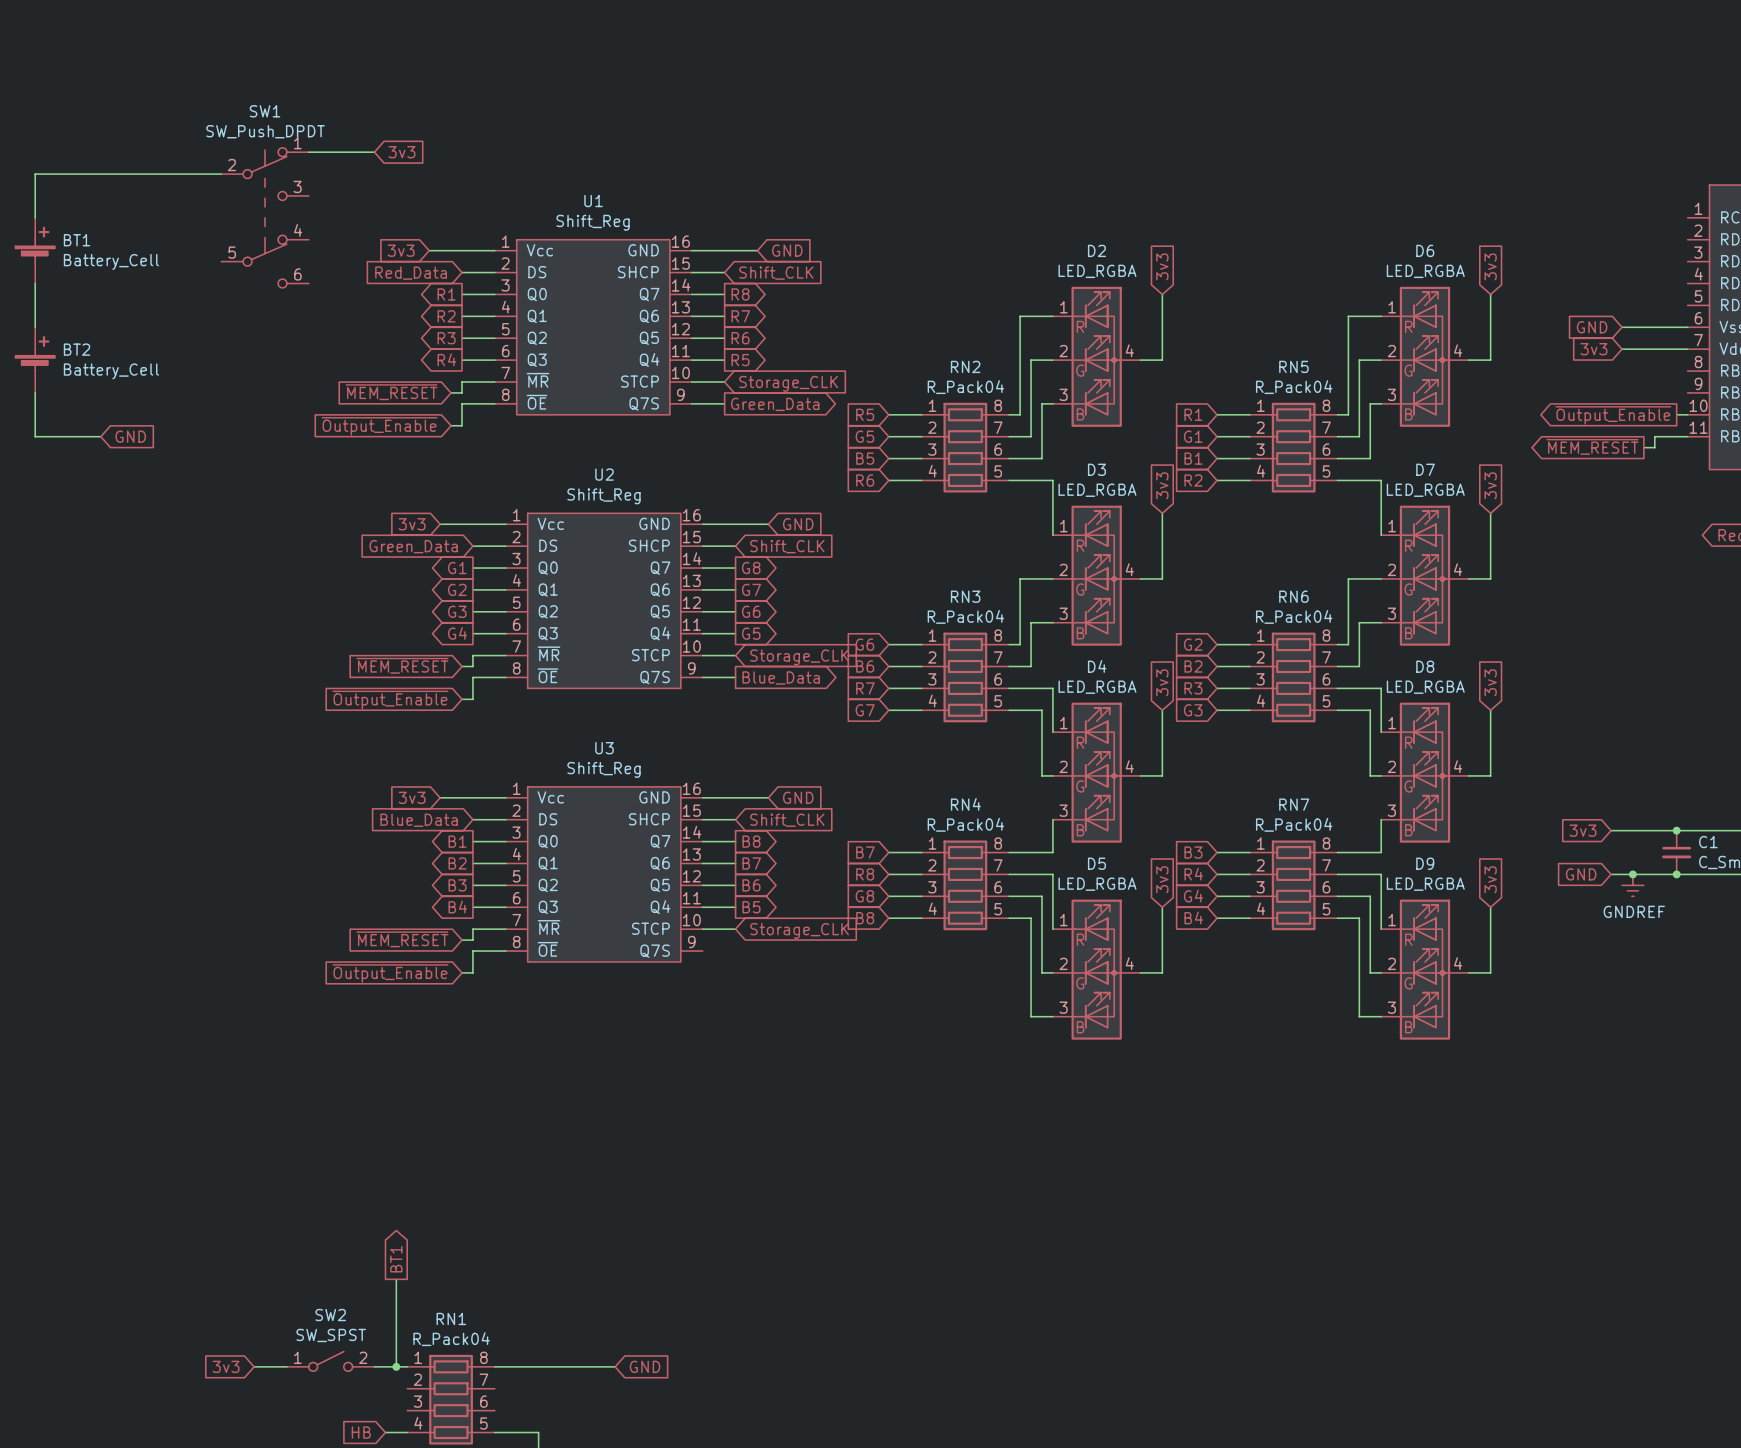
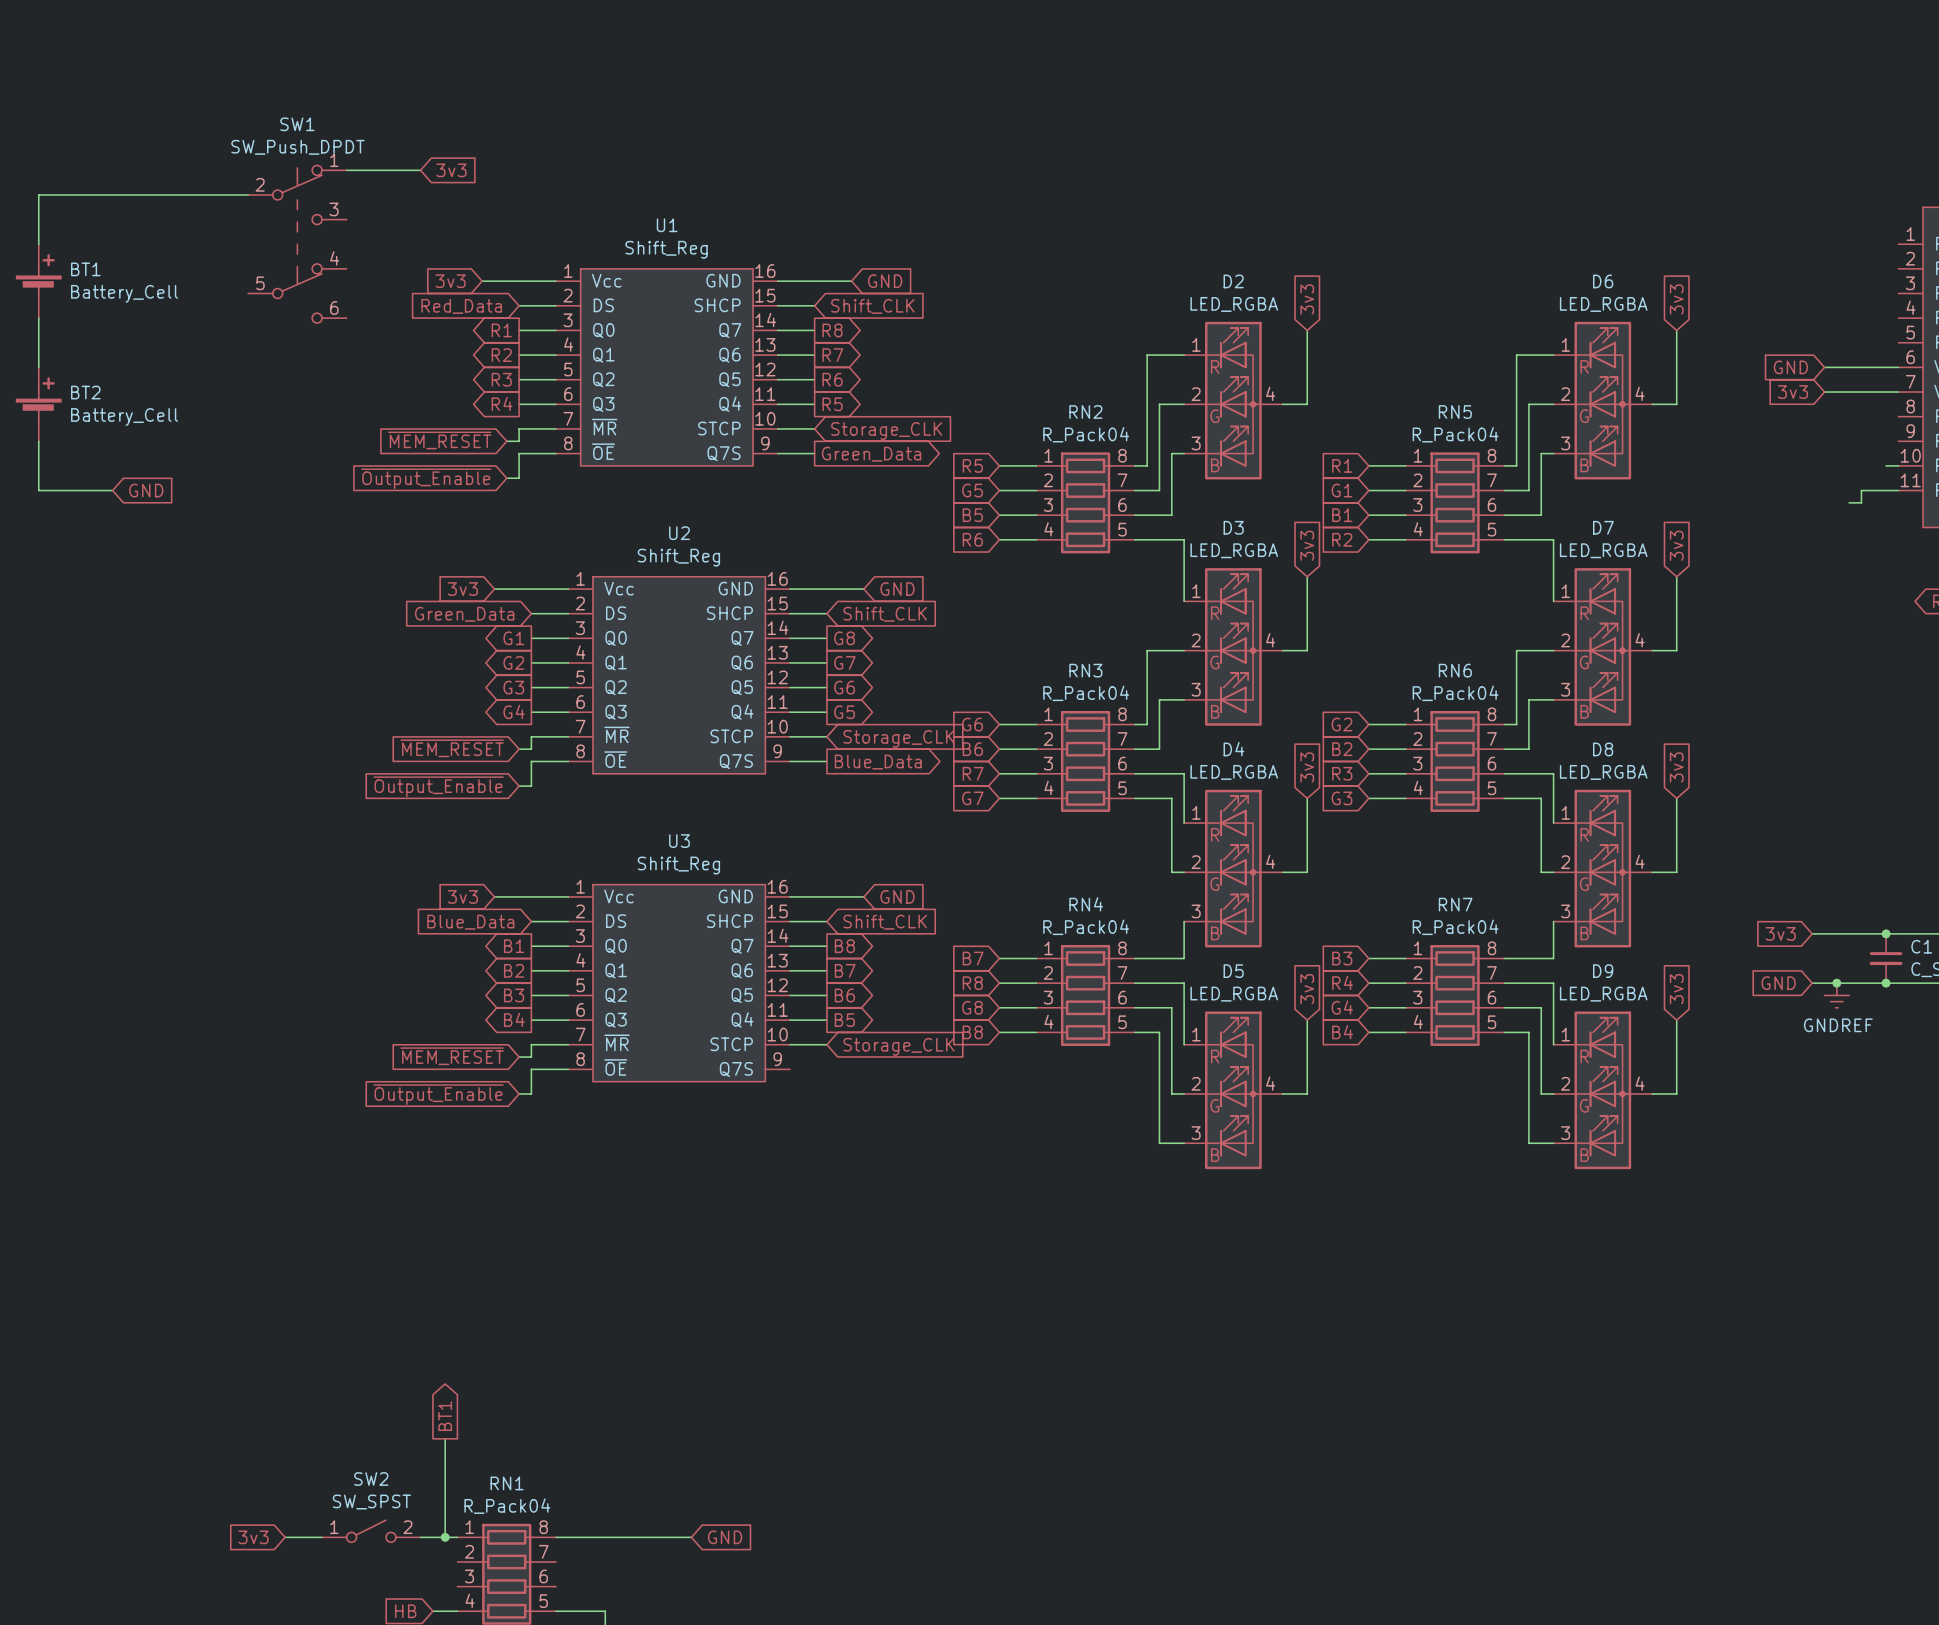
global label: ~{Output_Enable} (1613, 415) -> none
global label: ~{MEM_RESET} (1592, 446) -> none

